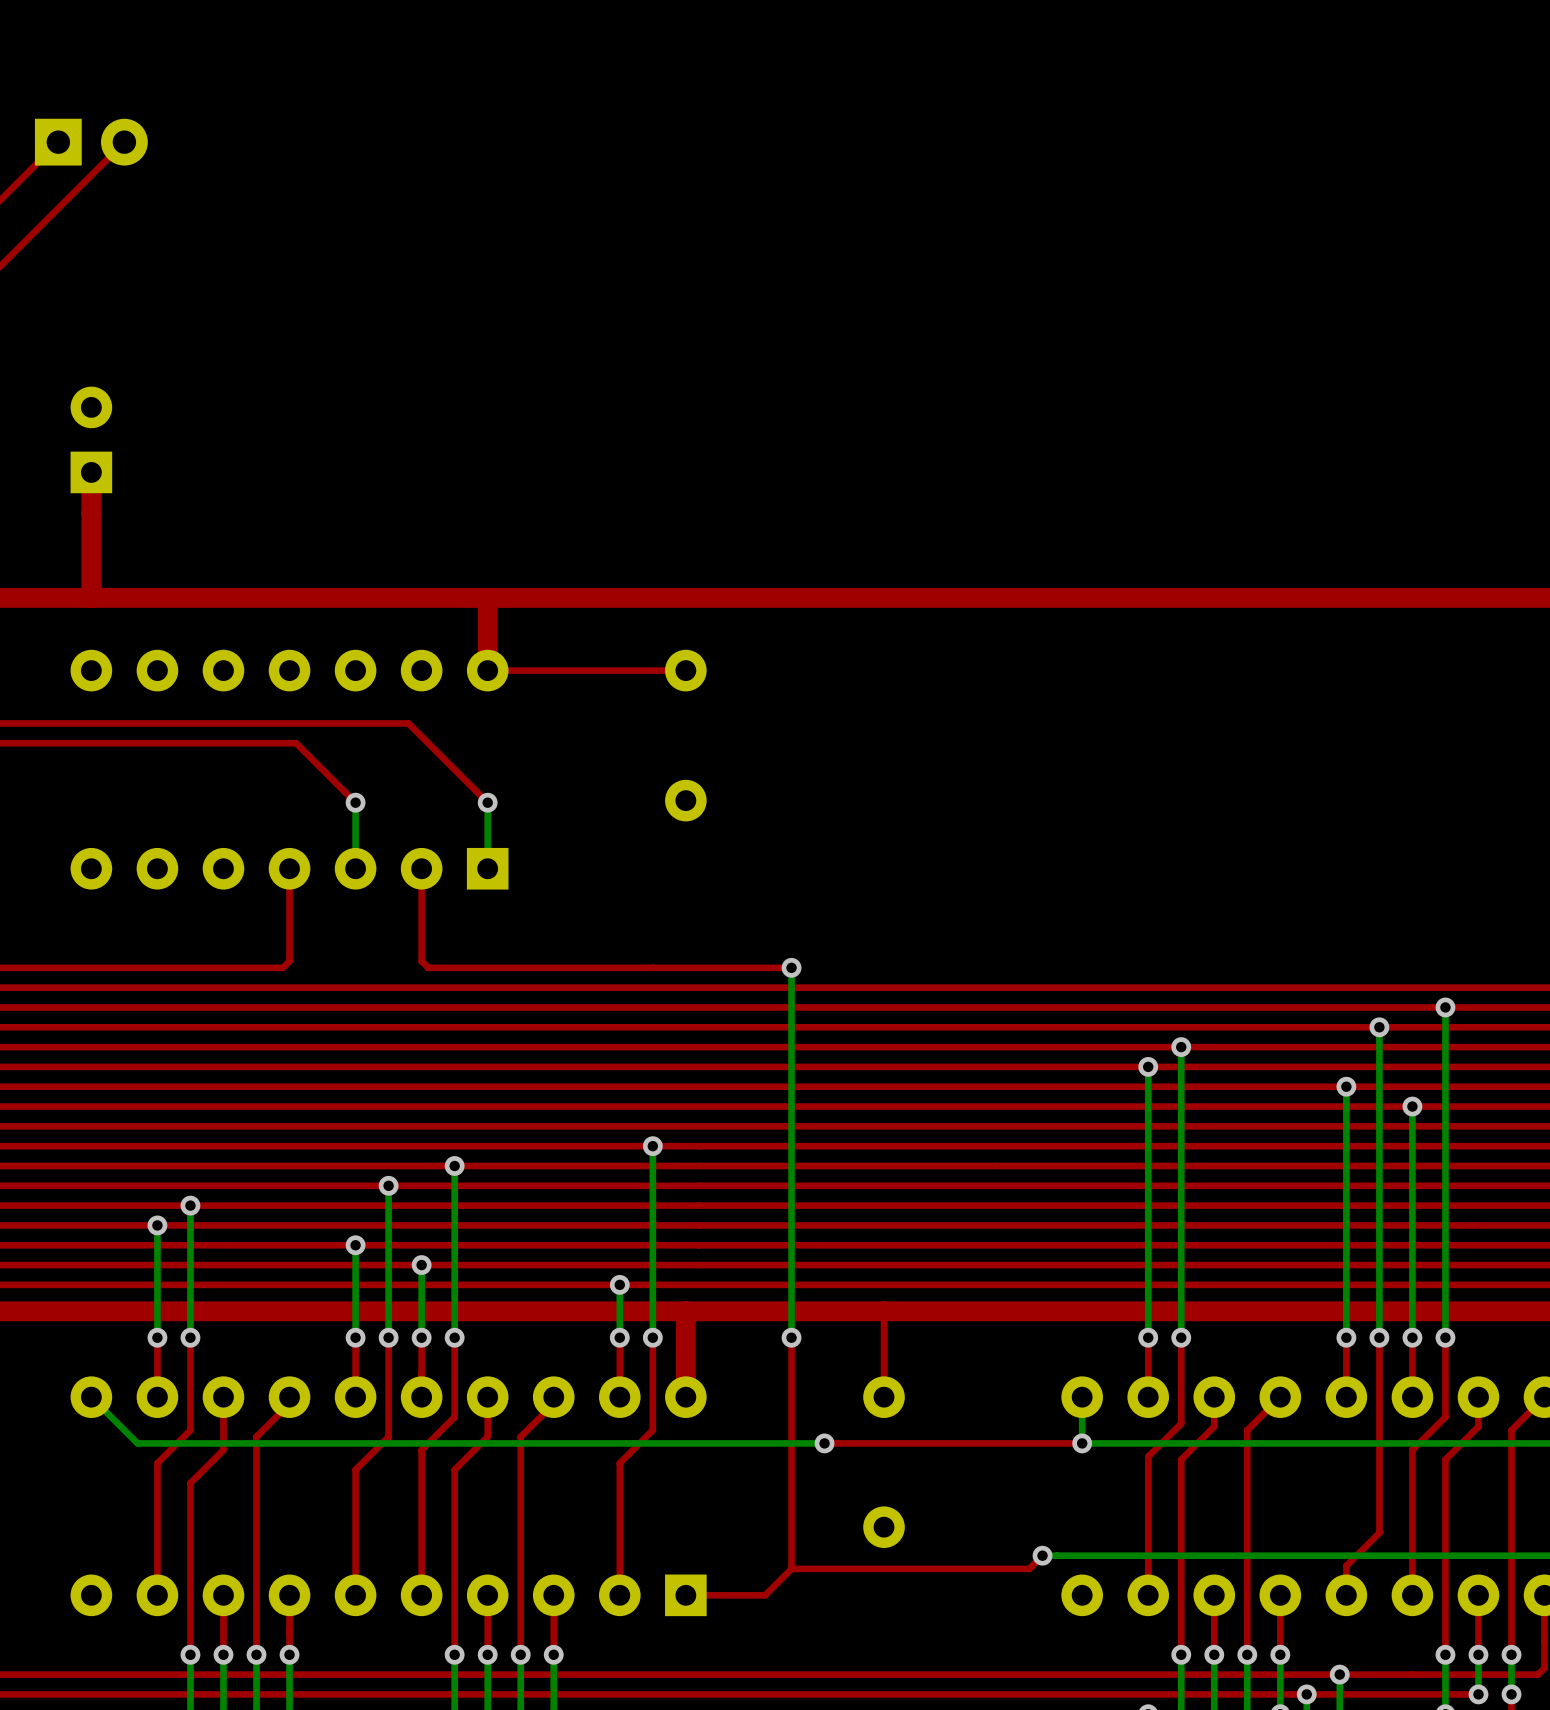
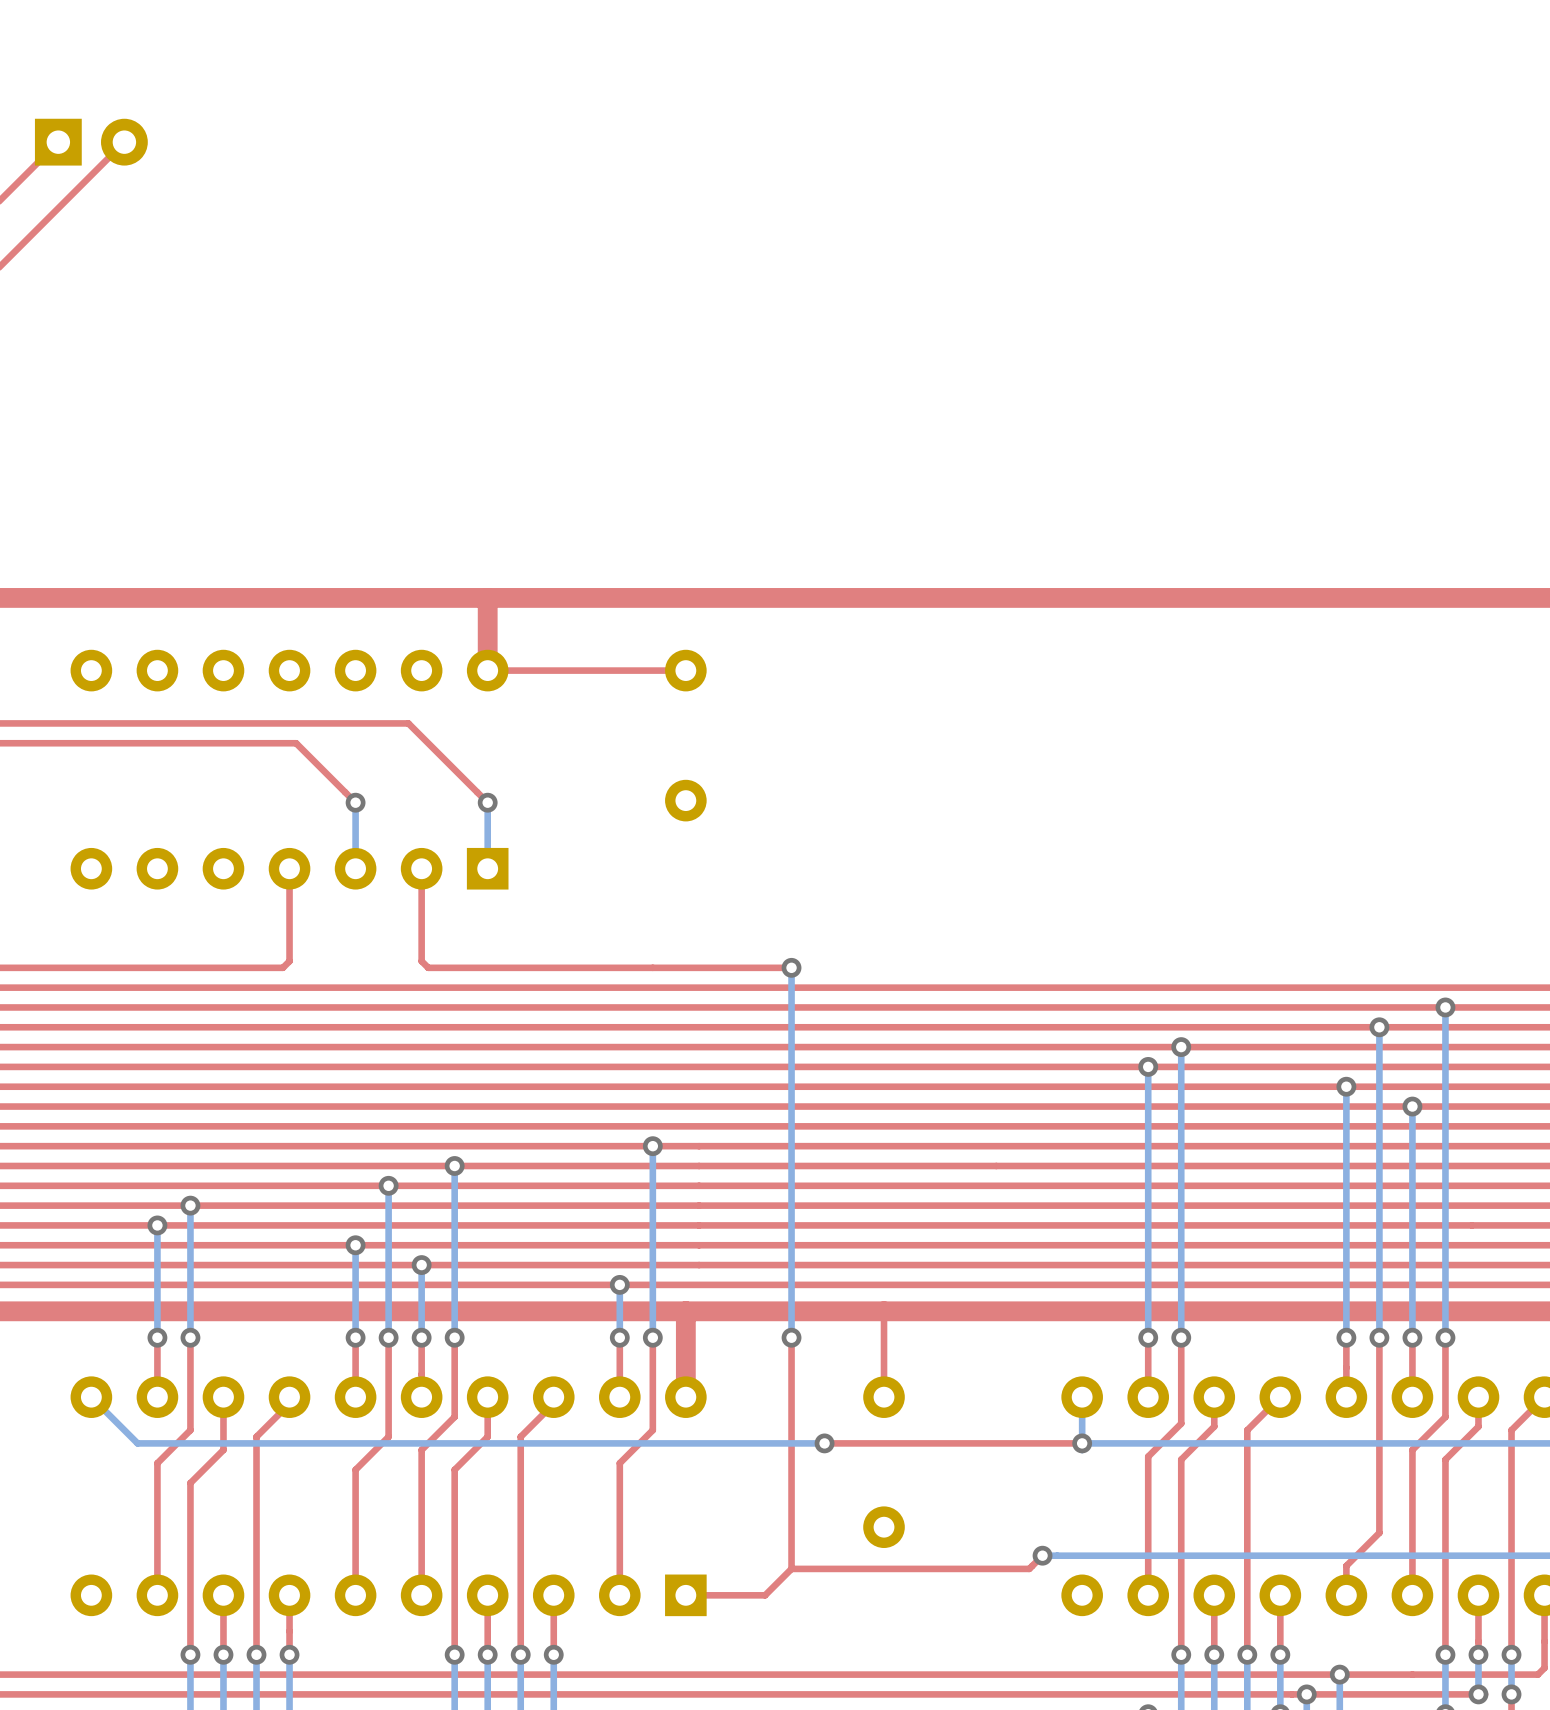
part: (91, 439) -> none
top track: (91, 472) (91, 597) -> none

